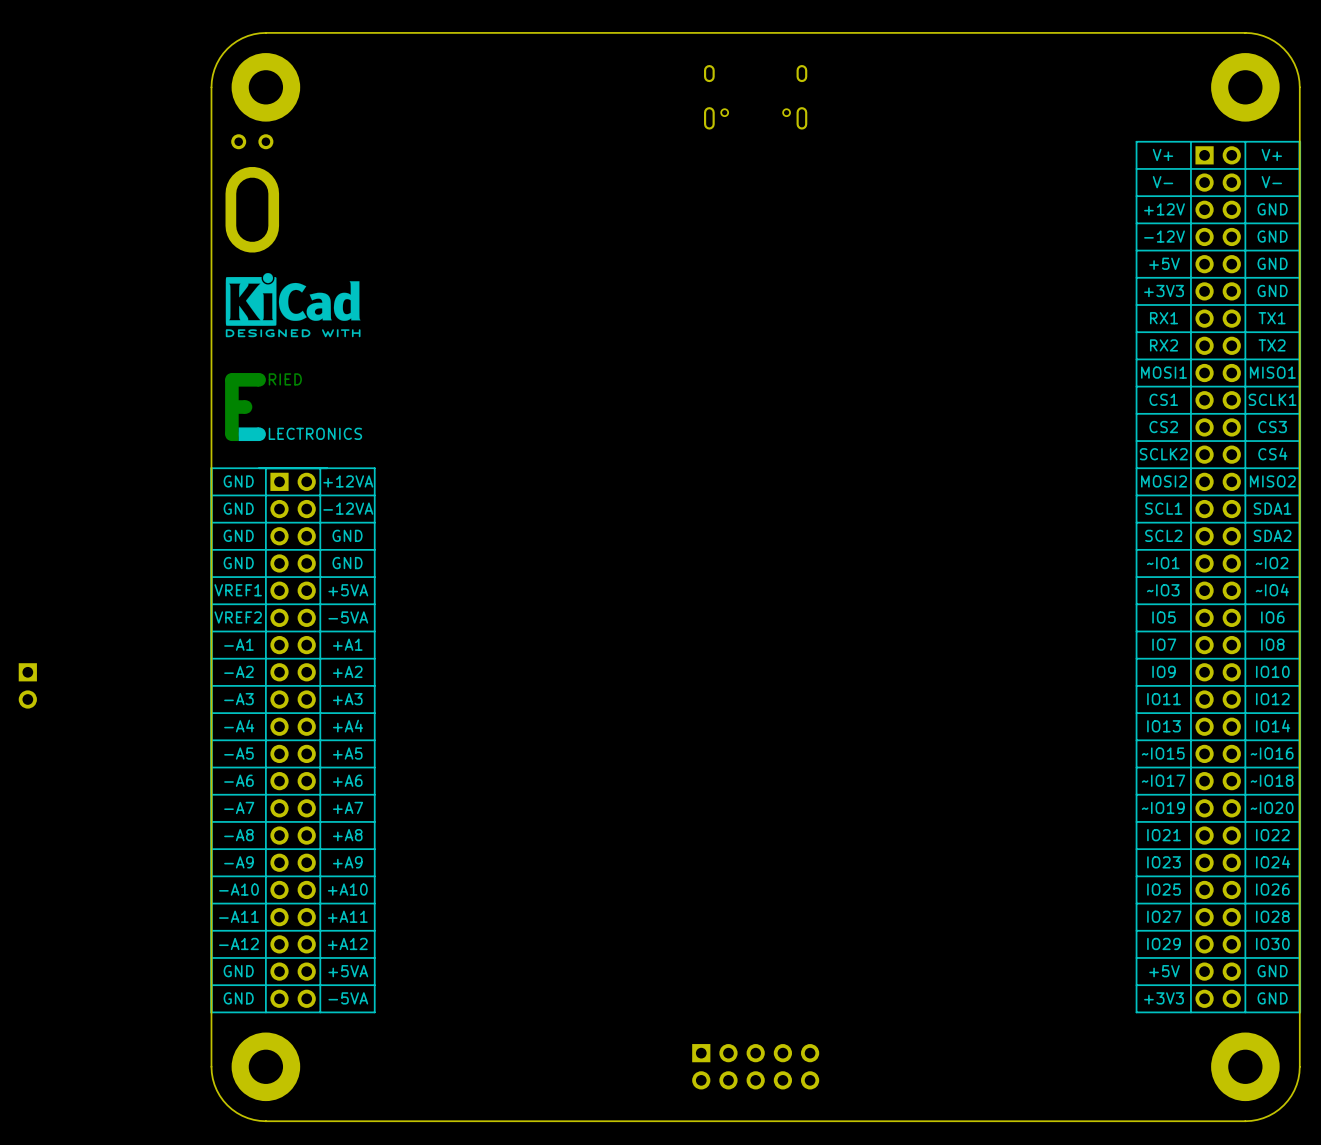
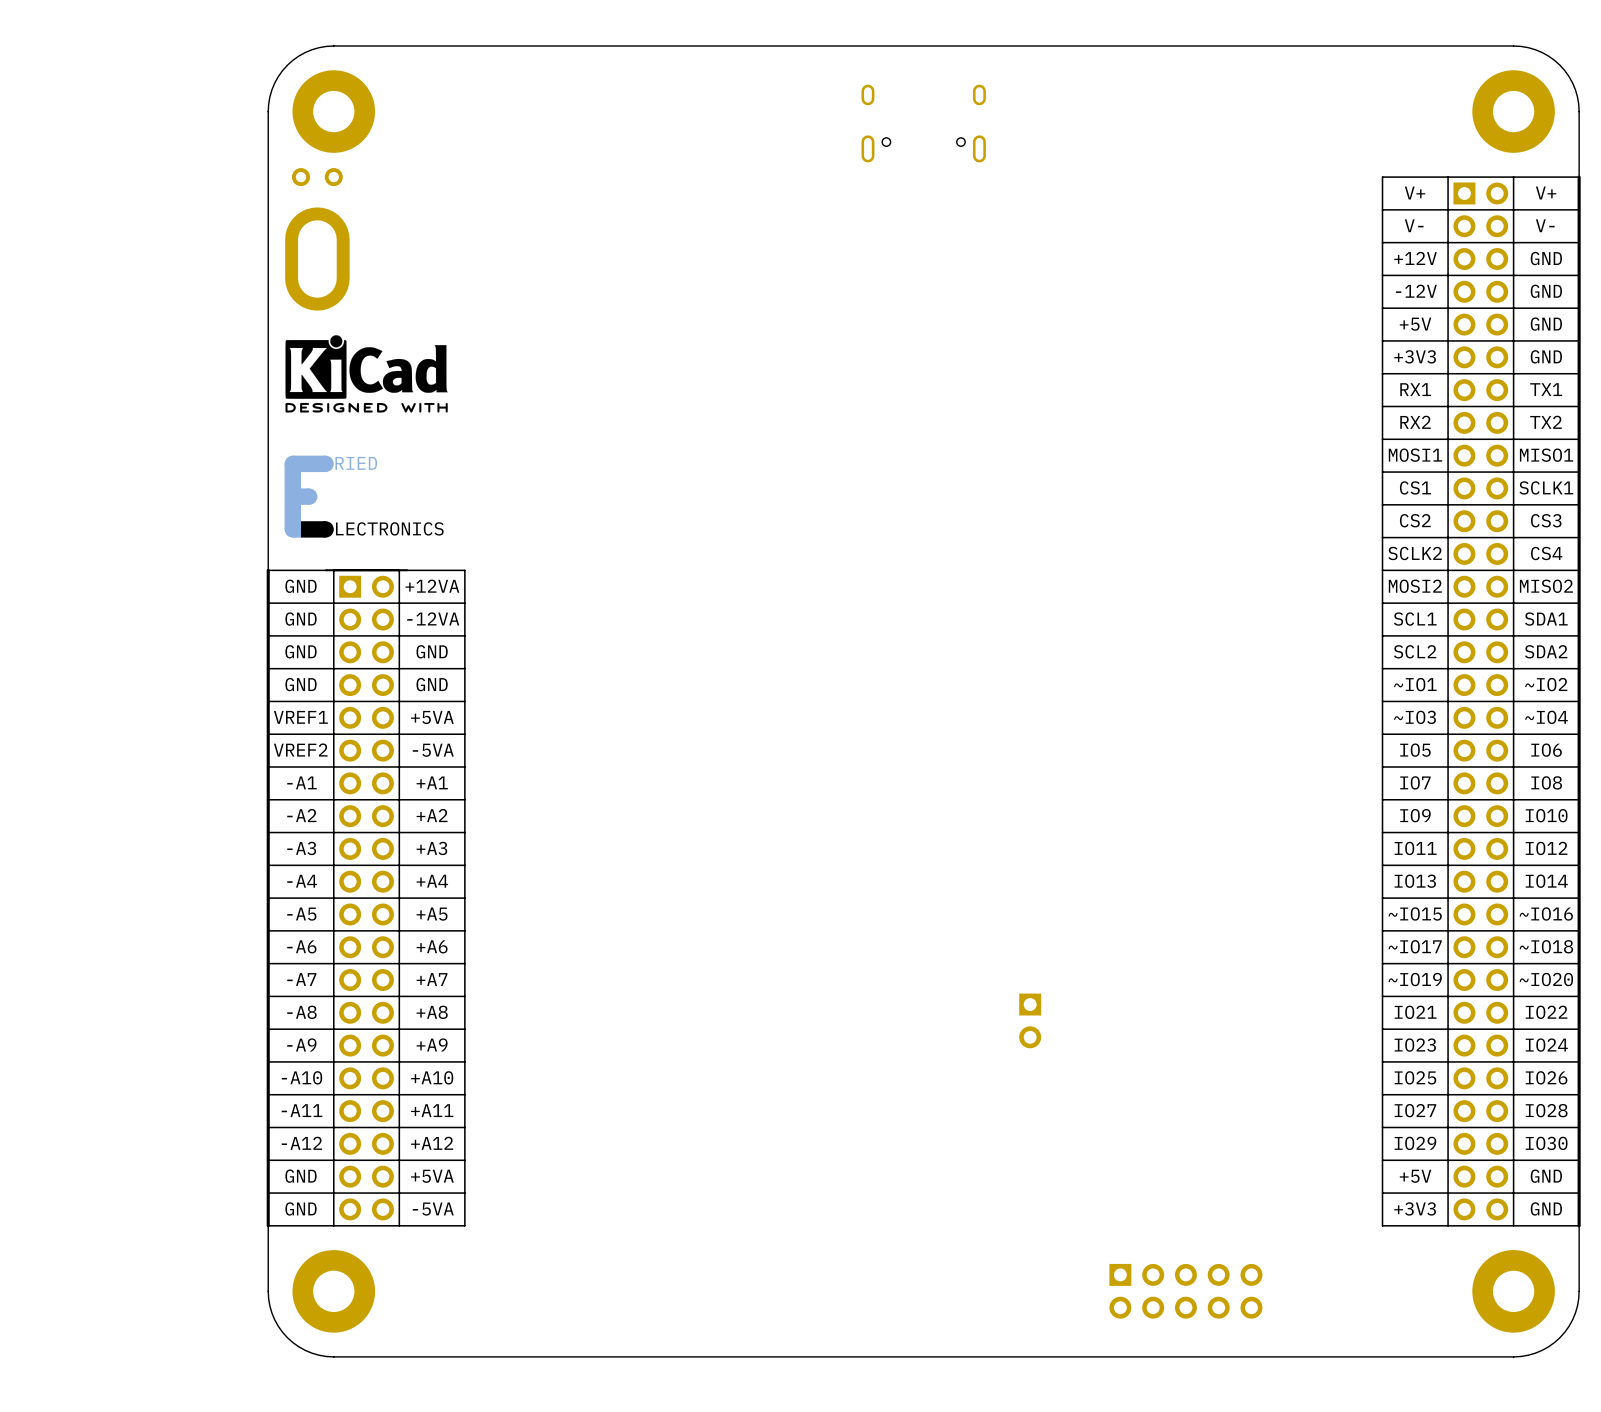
part: (27, 685) -> none
part: none -> (1030, 1020)
part position: (755, 1066) -> (1185, 1291)

